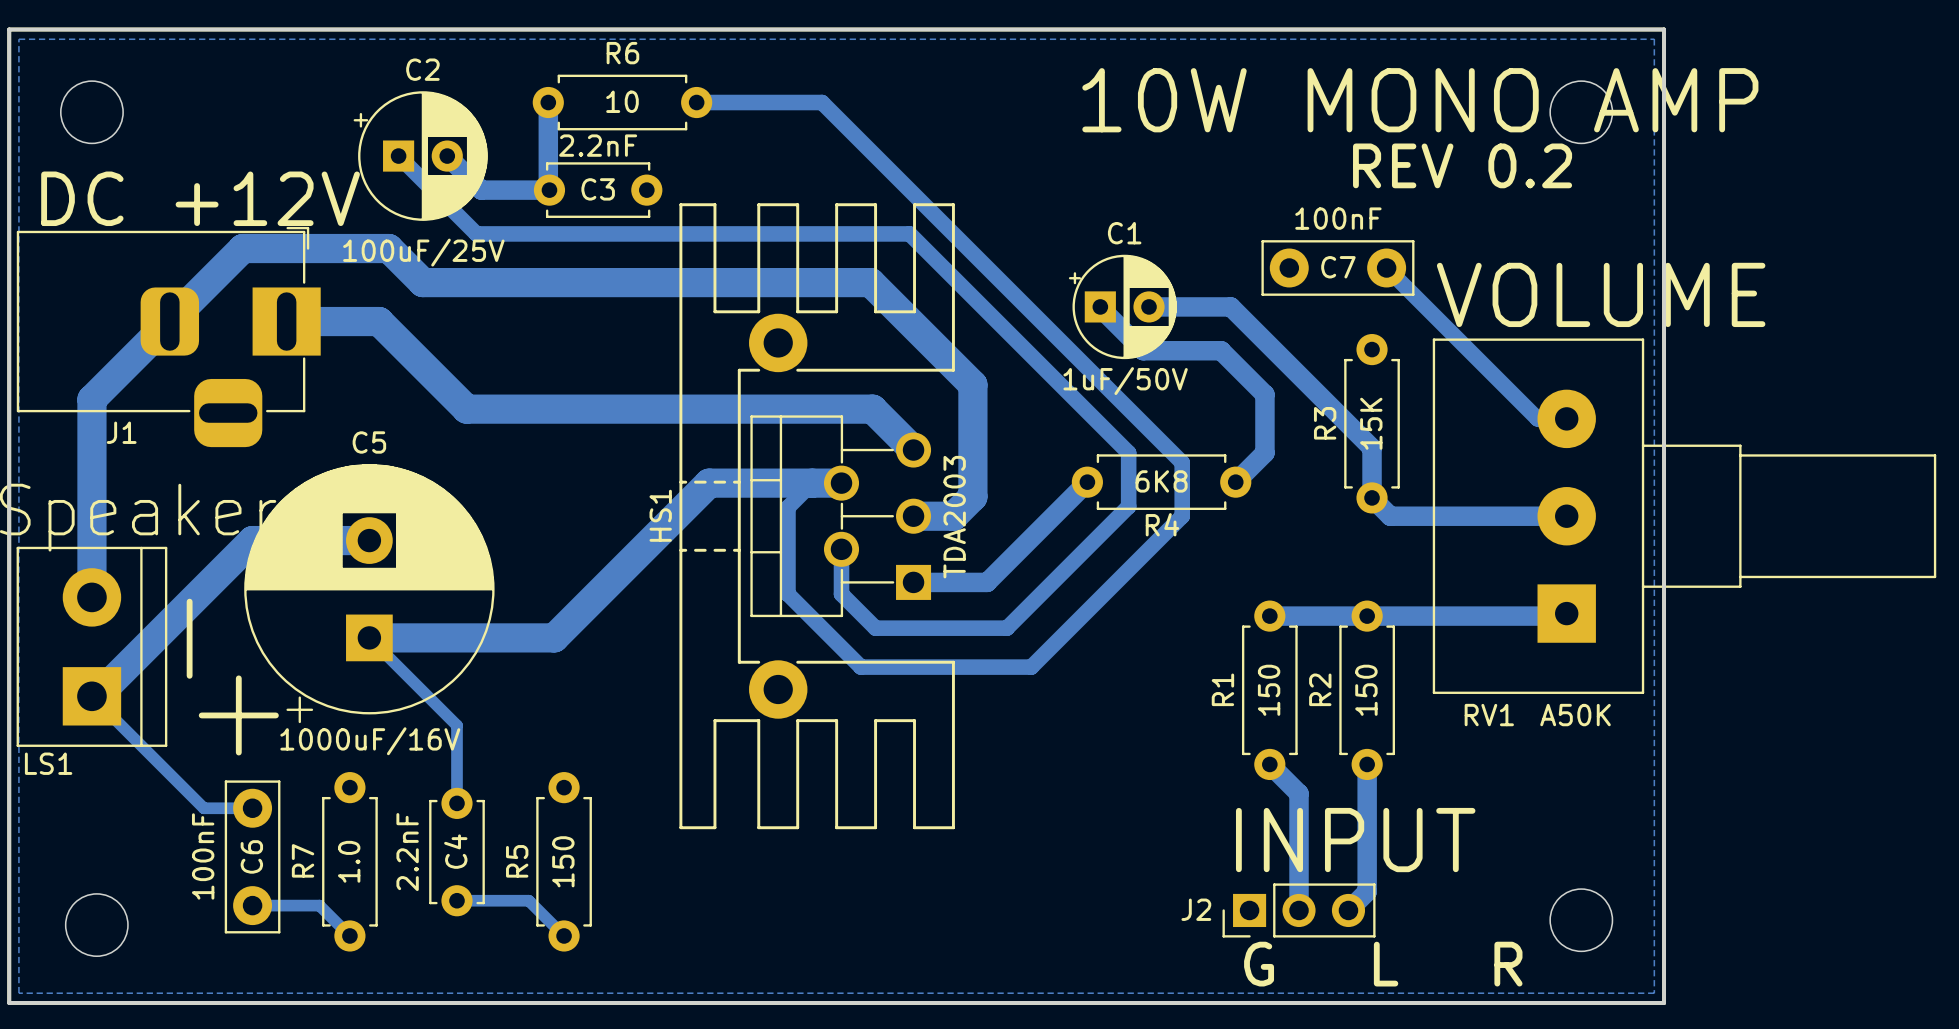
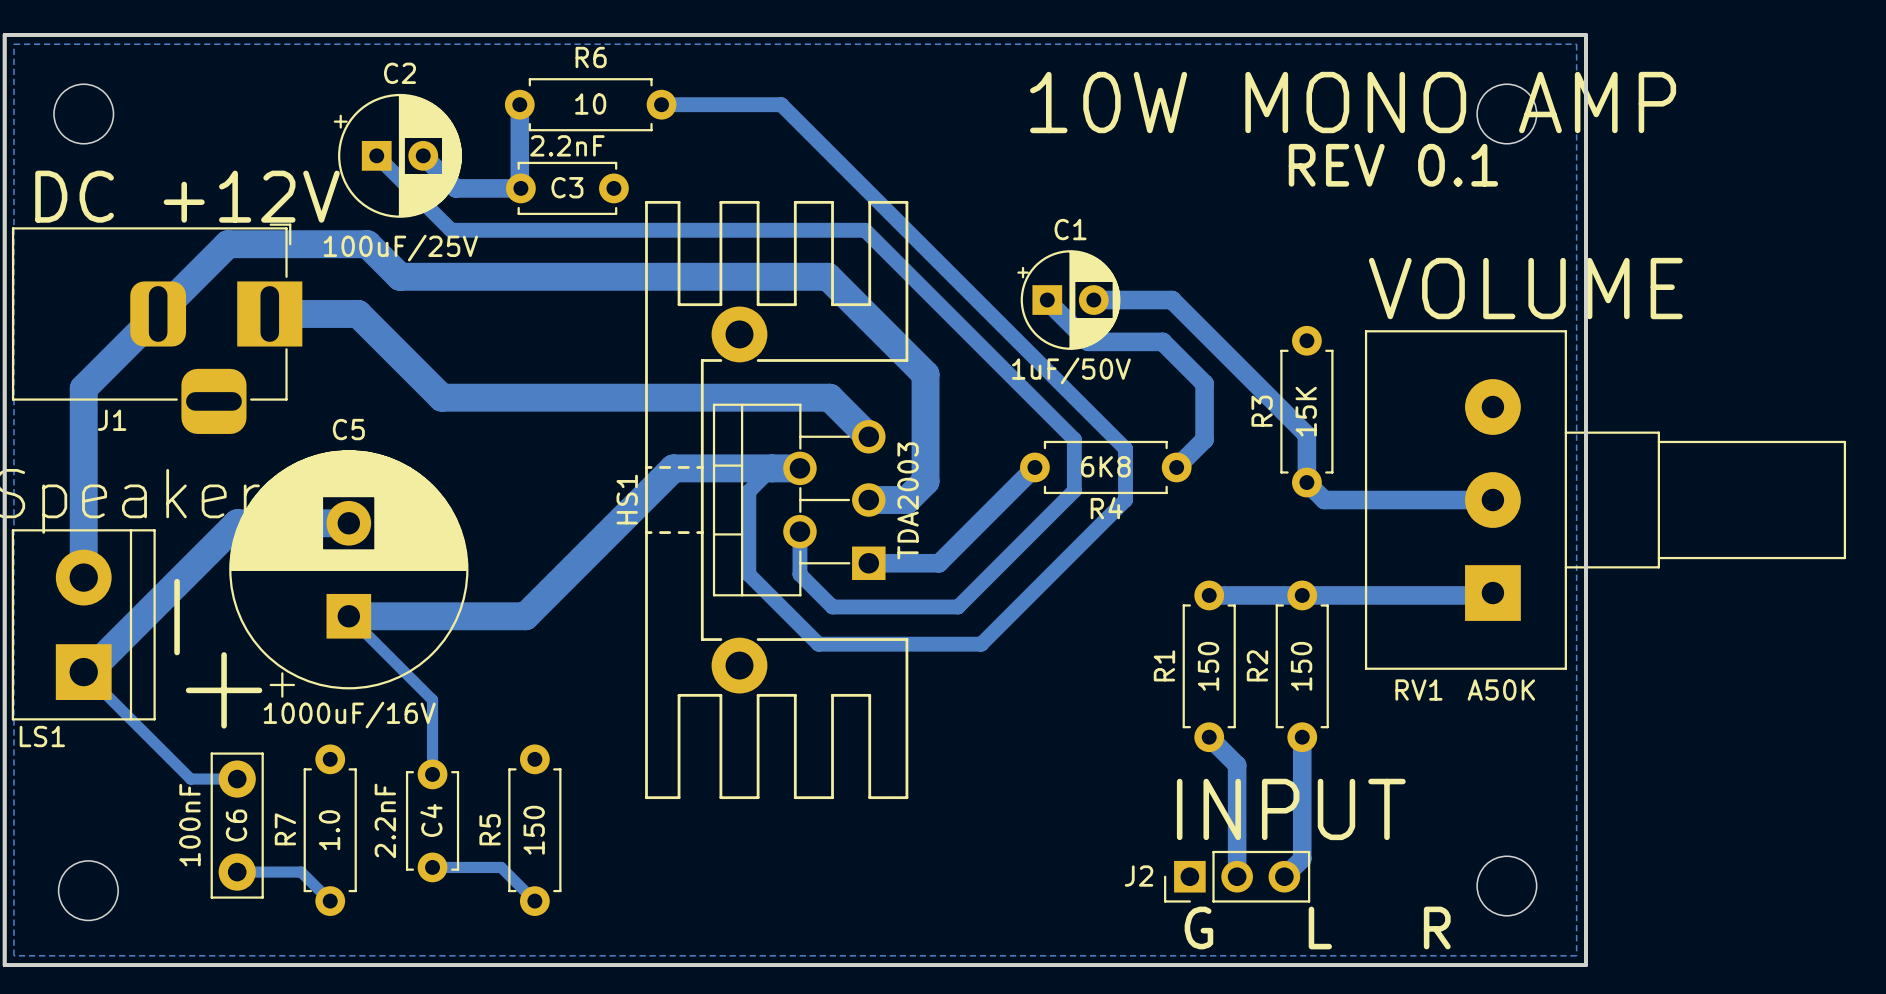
text: REV 0.2 (1462, 165) -> REV 0.1 (1393, 165)
C7: 100nF (1337, 268) -> none
bottom track: (1386, 268) (1537, 418) (1566, 418) -> none

